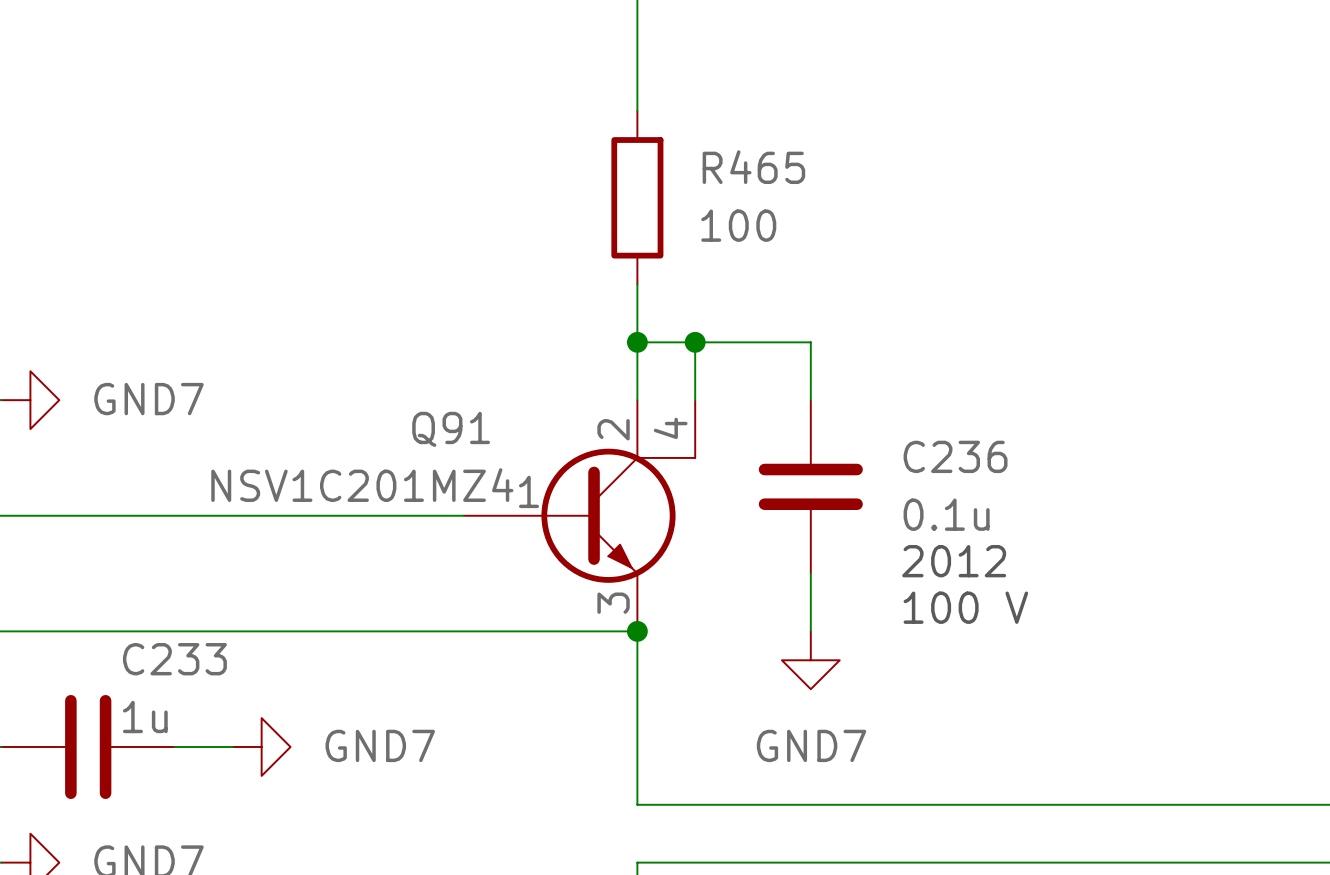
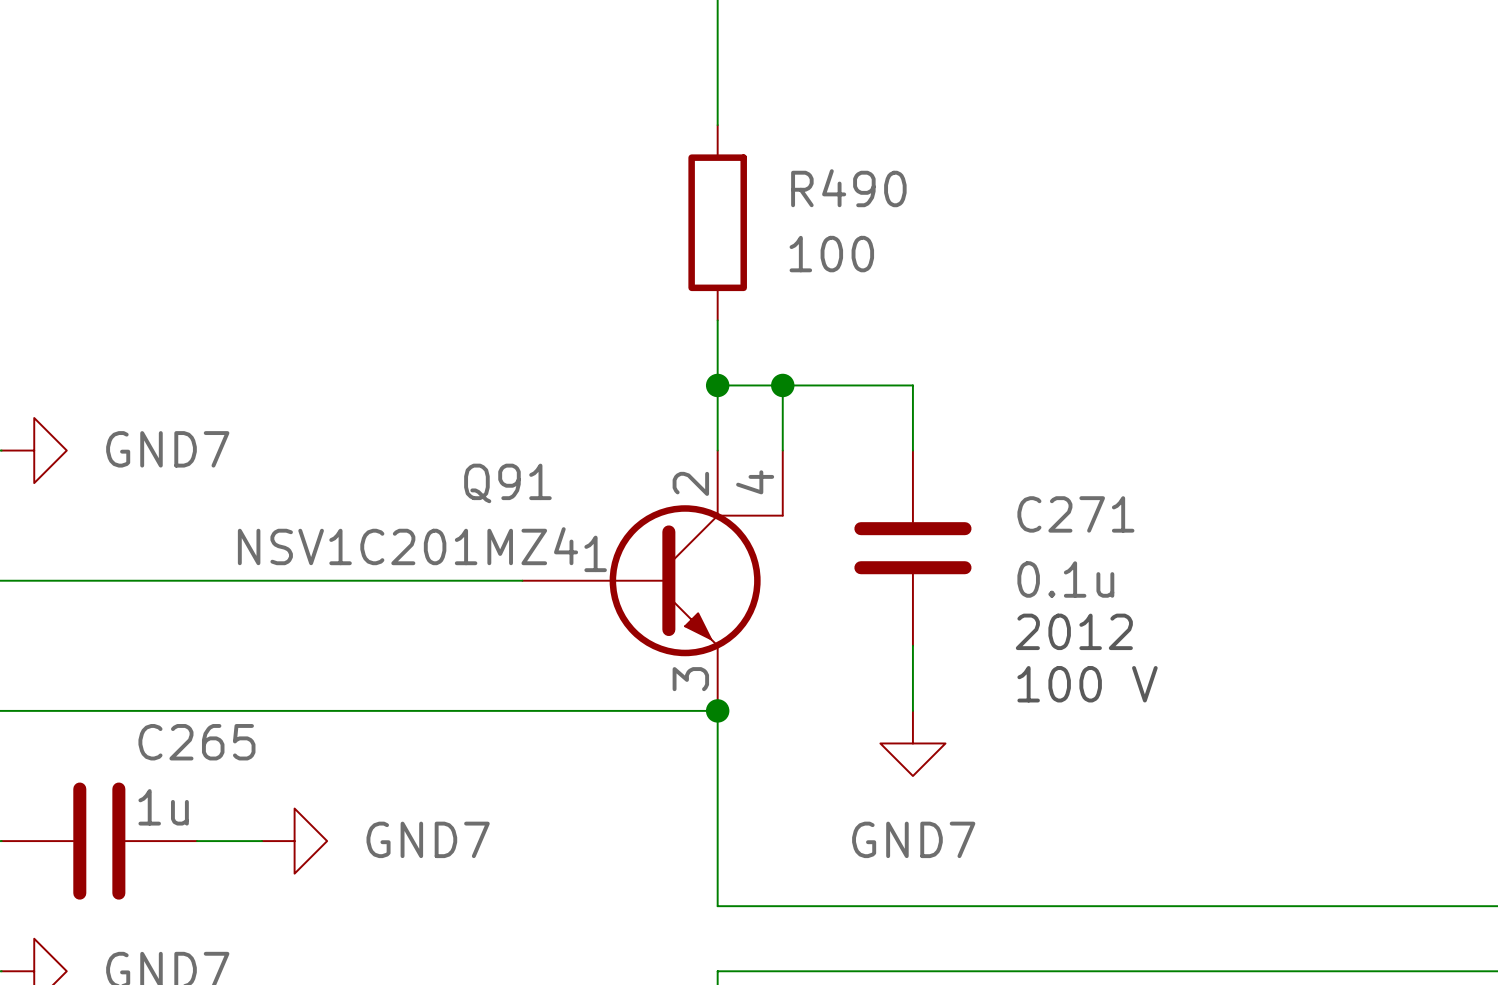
R465 name: R465 (753, 167) -> R490 (848, 188)
C236 name: C236 (955, 456) -> C271 (1075, 514)
C233 name: C233 (174, 659) -> C265 (196, 742)

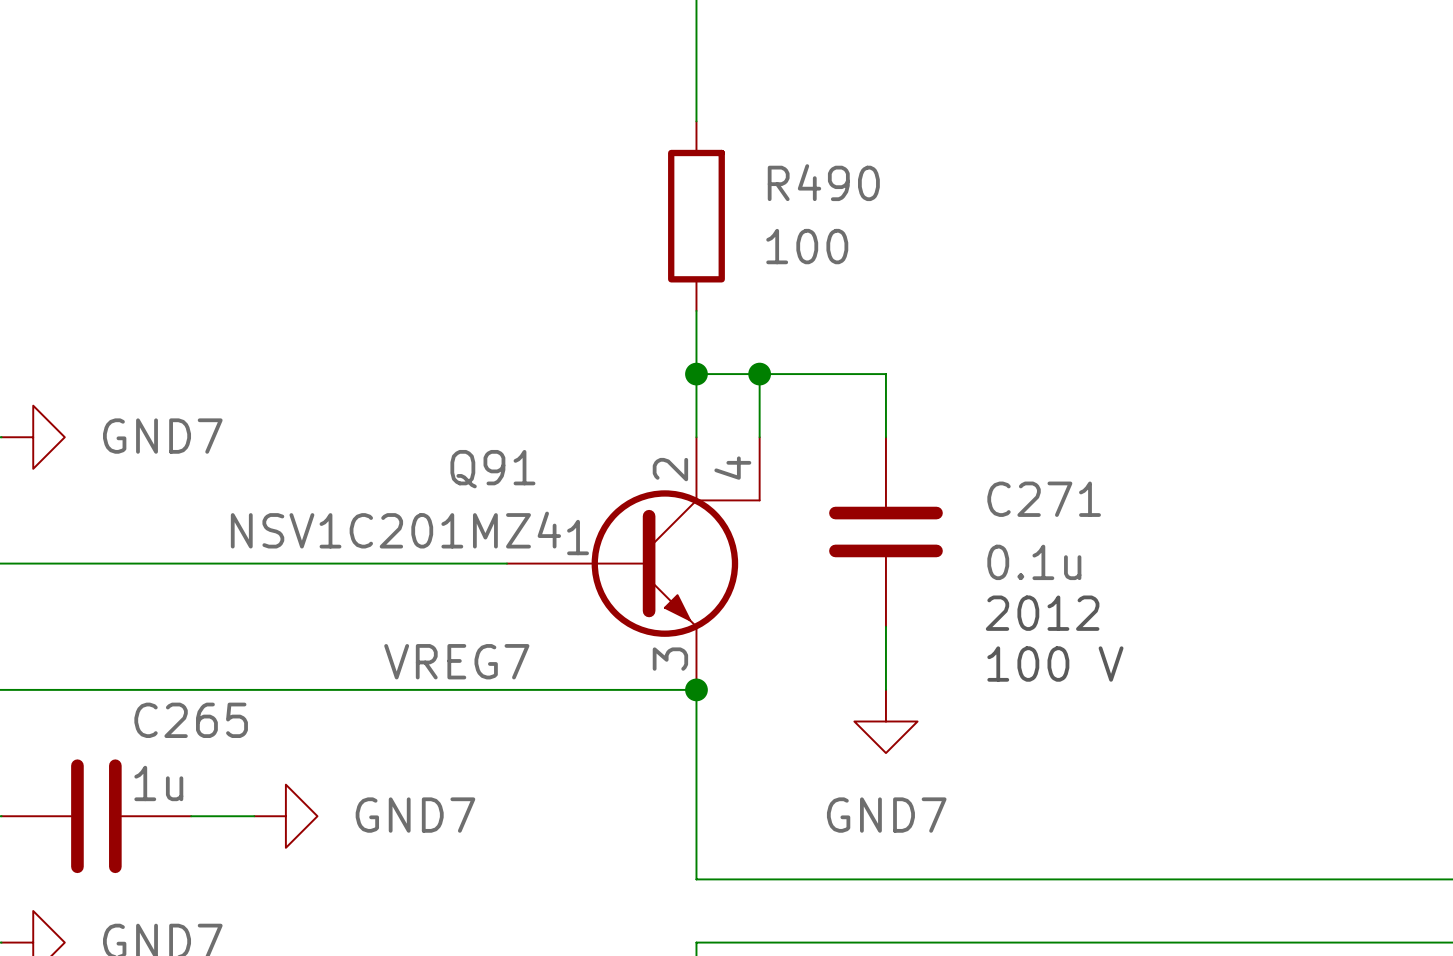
label: none -> VREG7 (456, 661)

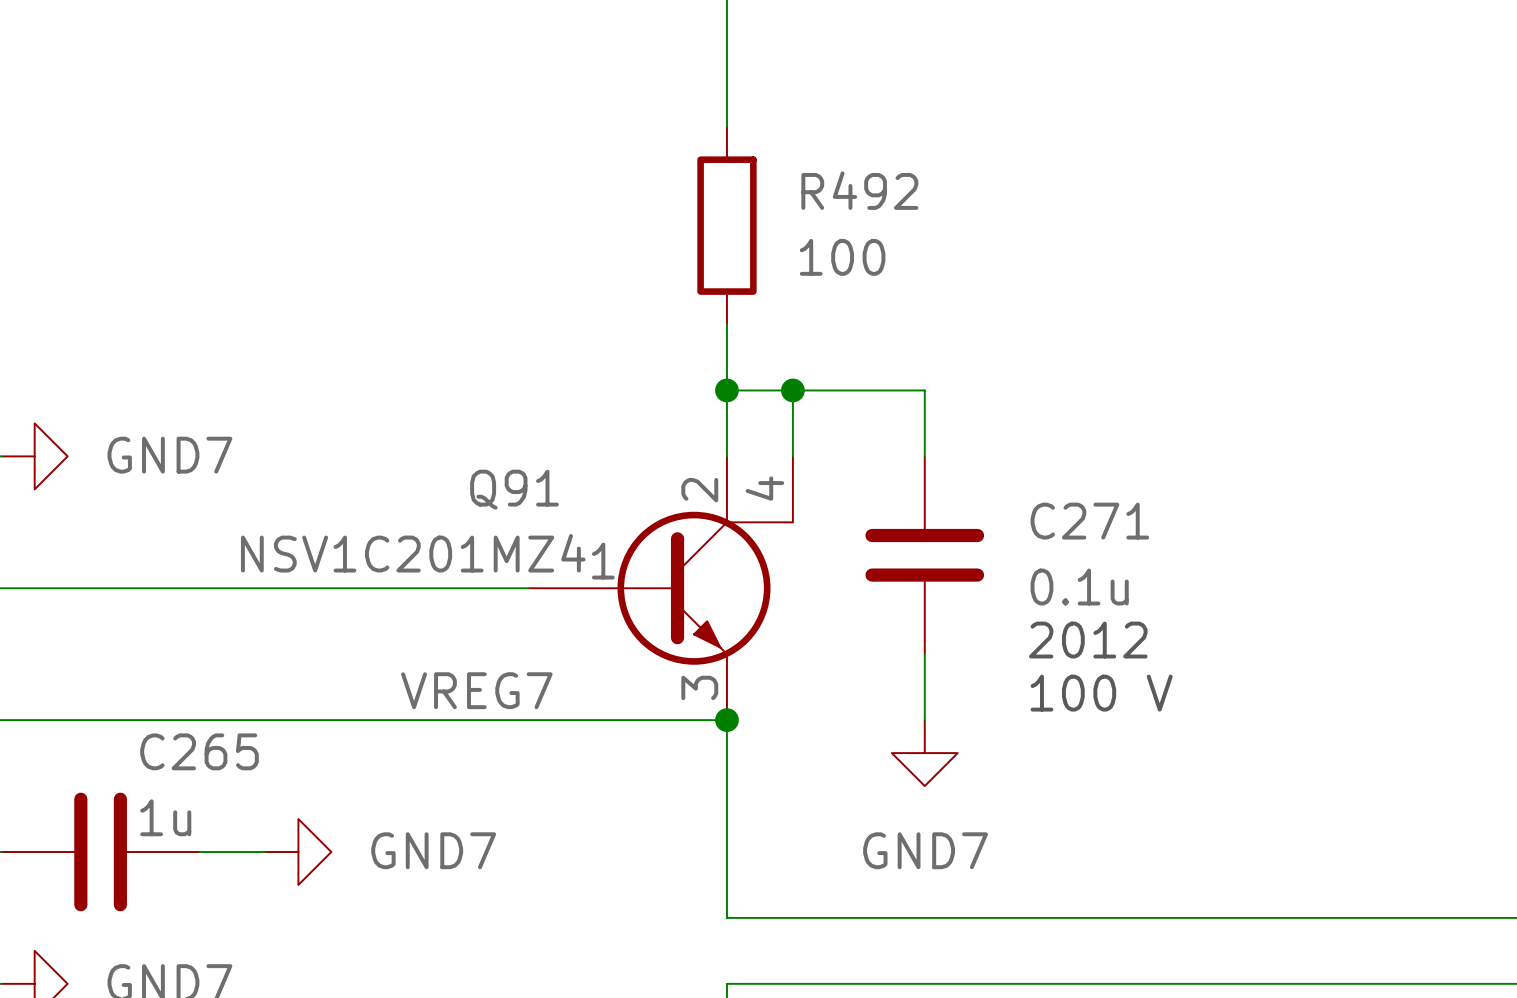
R490 name: R490 (823, 182) -> R492 (859, 190)

